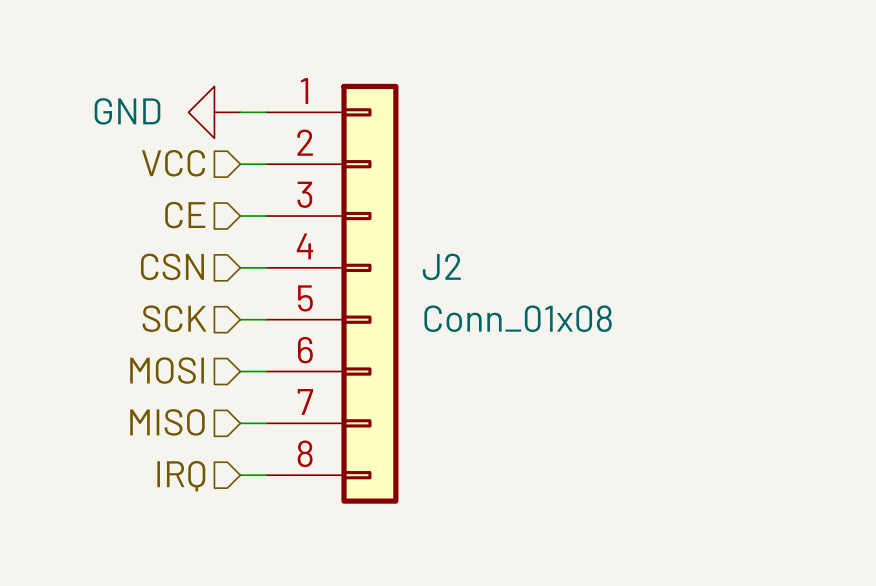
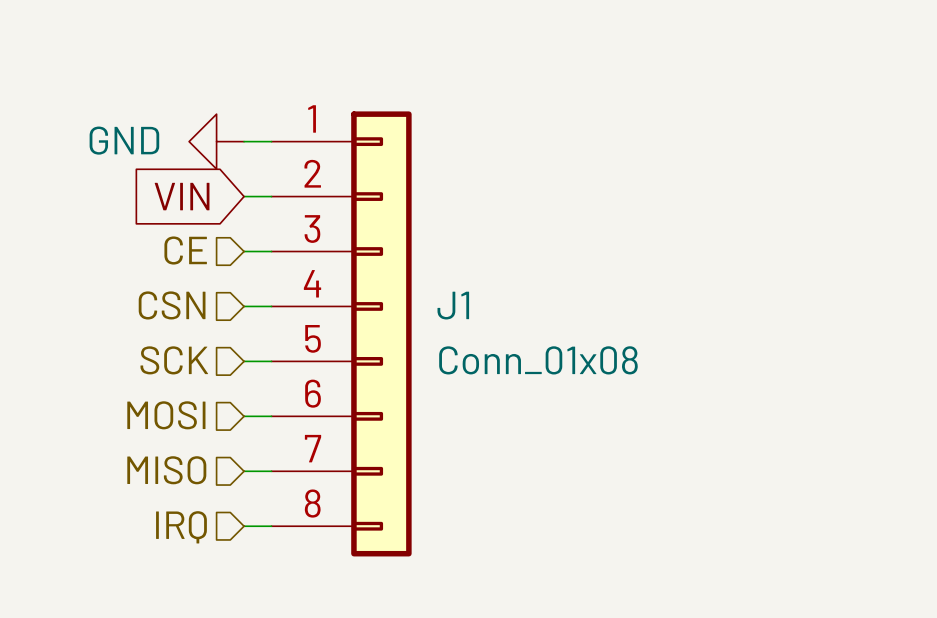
hierarchical label: VCC (173, 163) -> none
global label: none -> VIN (182, 196)
J2 name: J2 (441, 266) -> J1 (453, 305)

